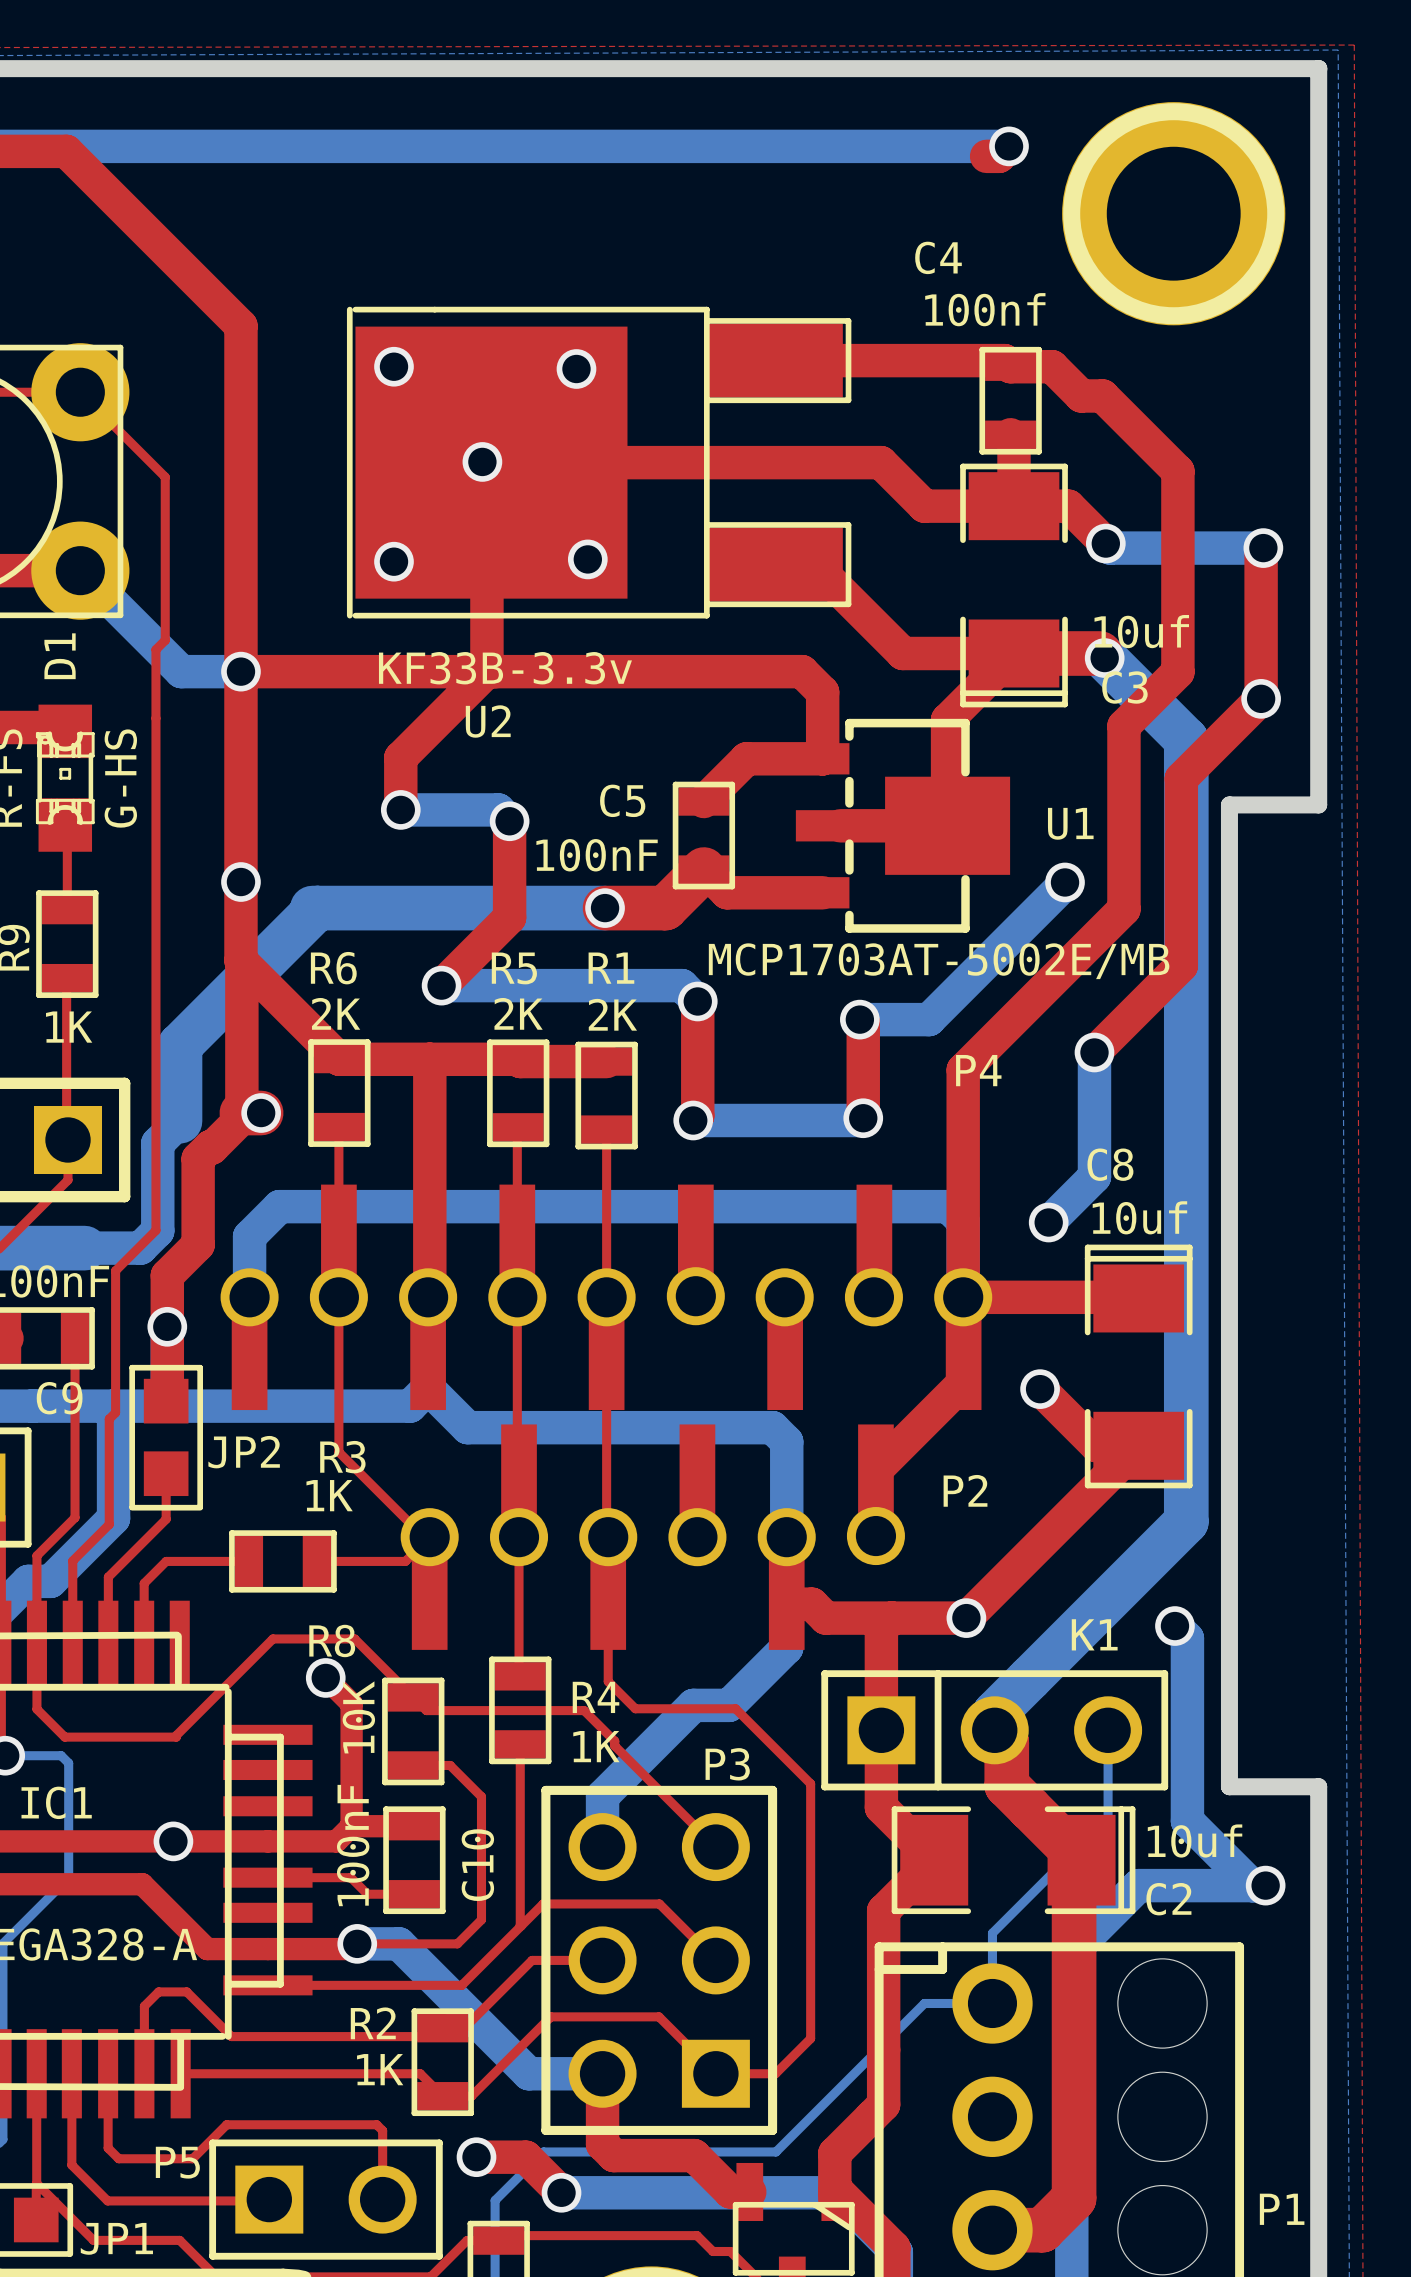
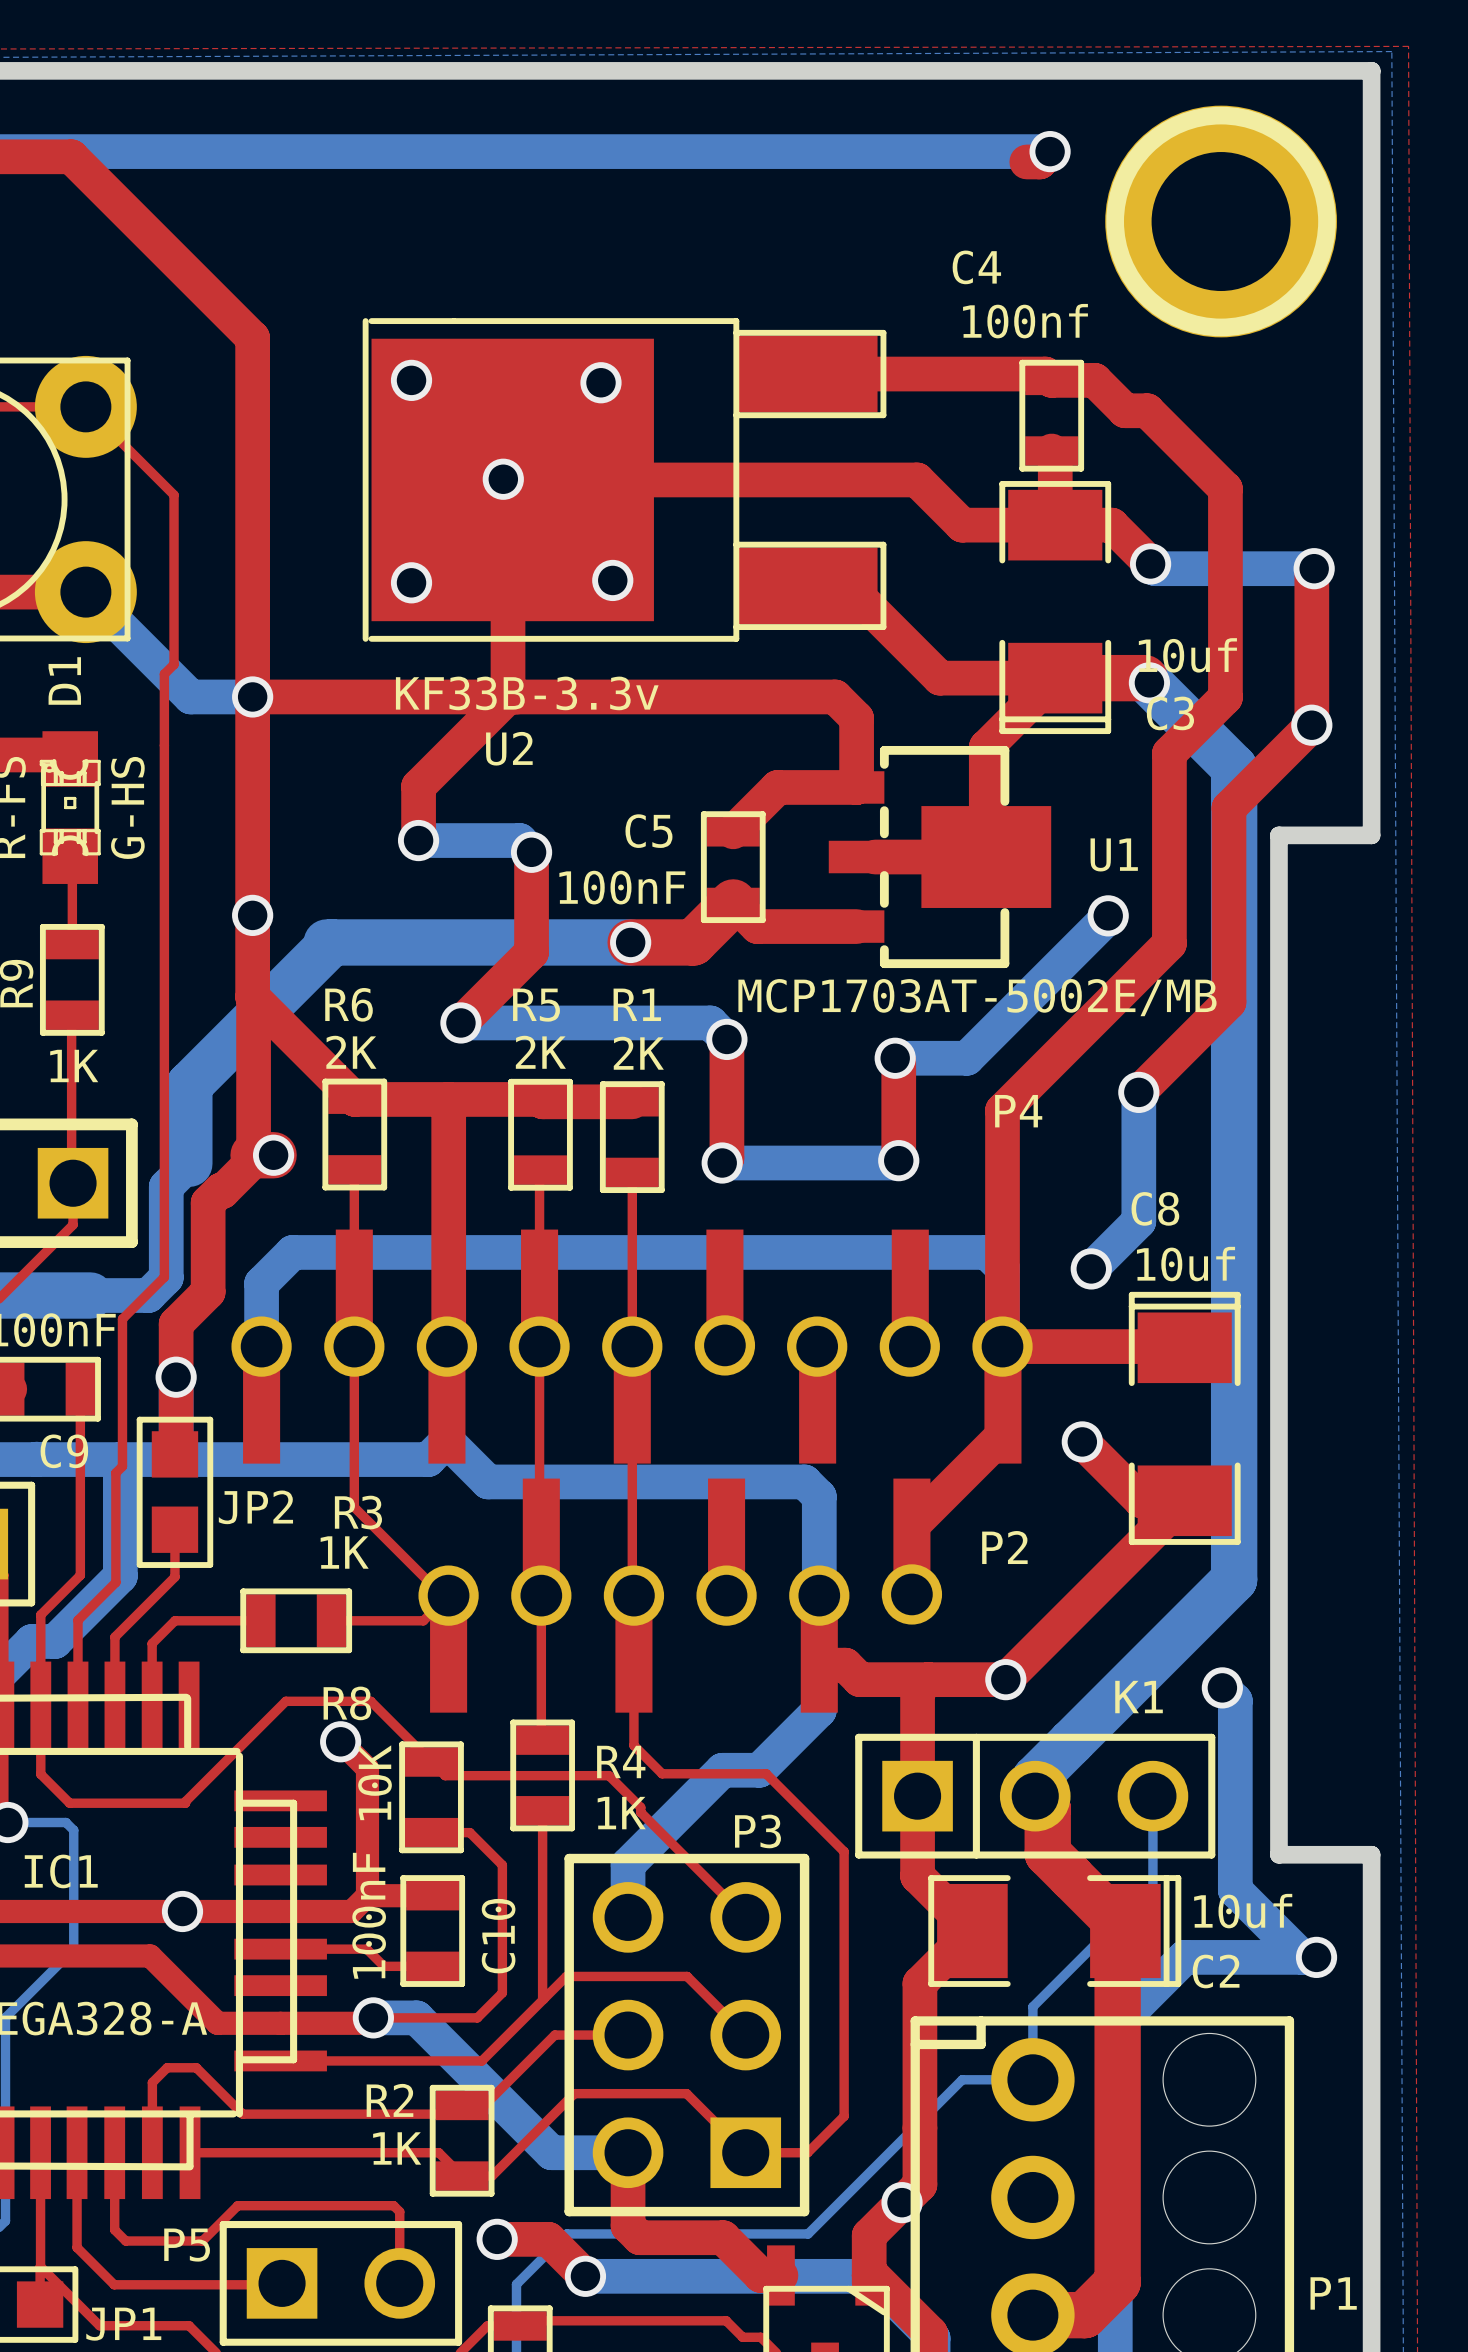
via: none -> (902, 2202)

